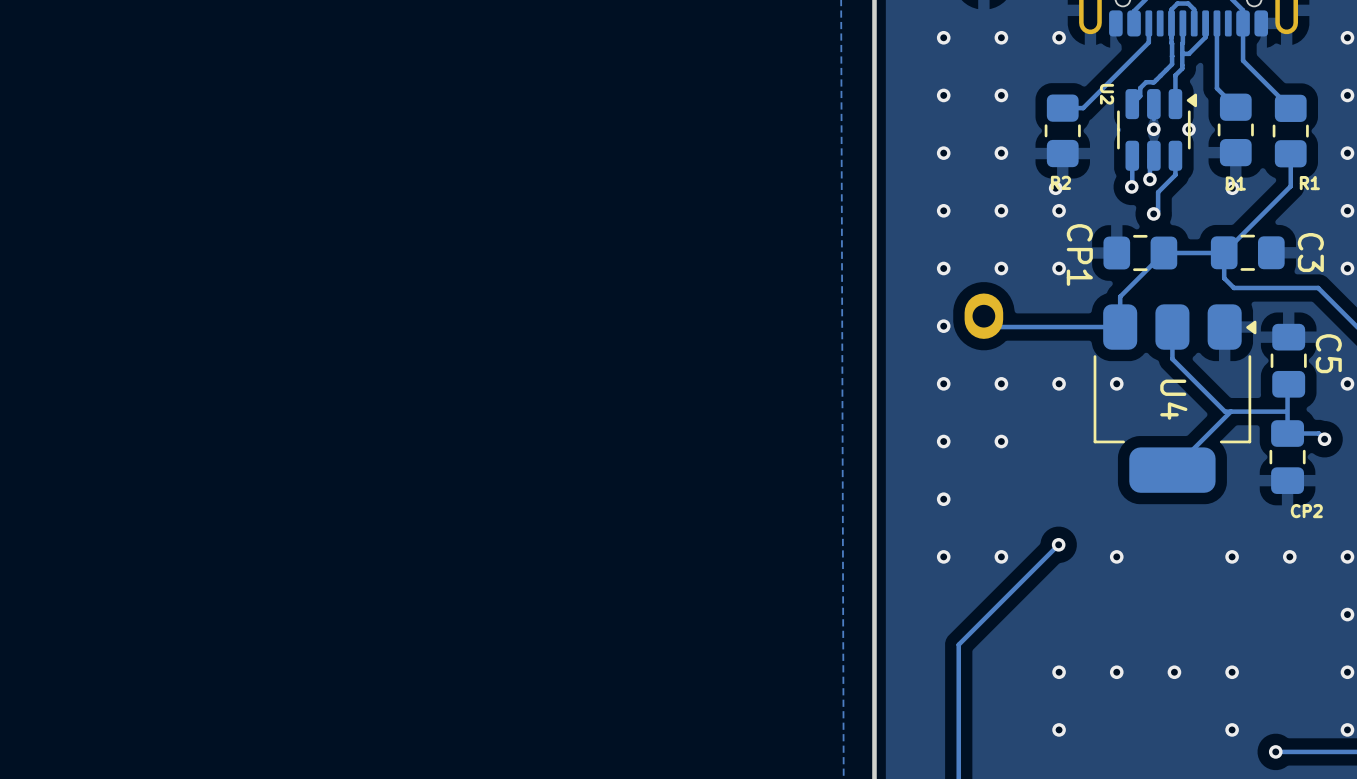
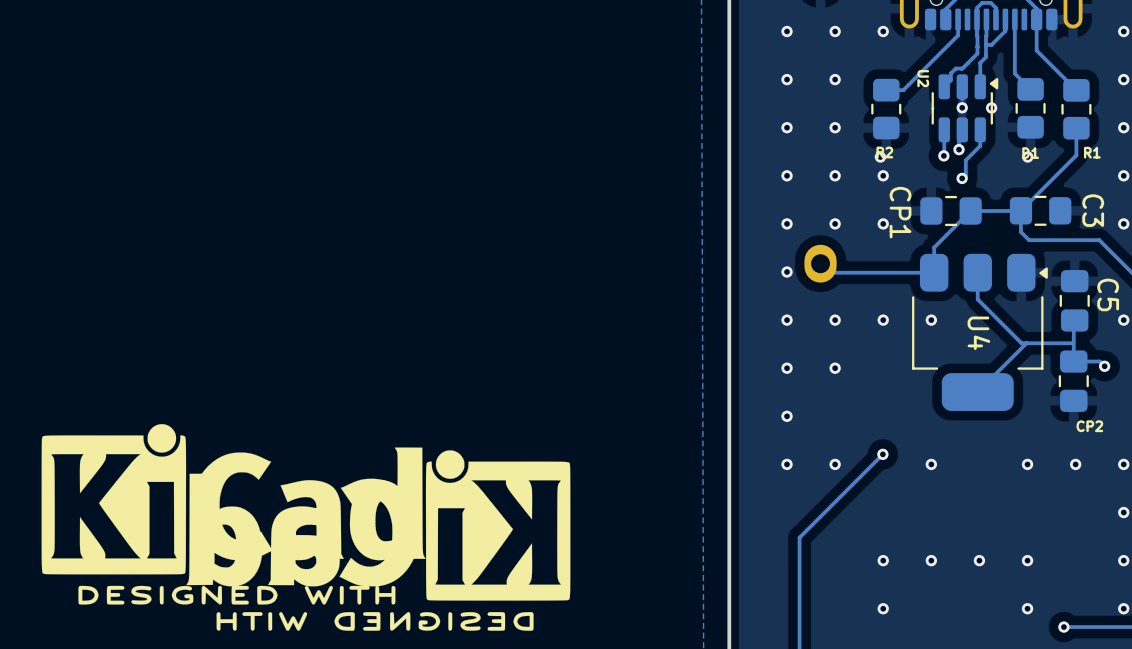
drawing: none -> [41, 424, 571, 631]

